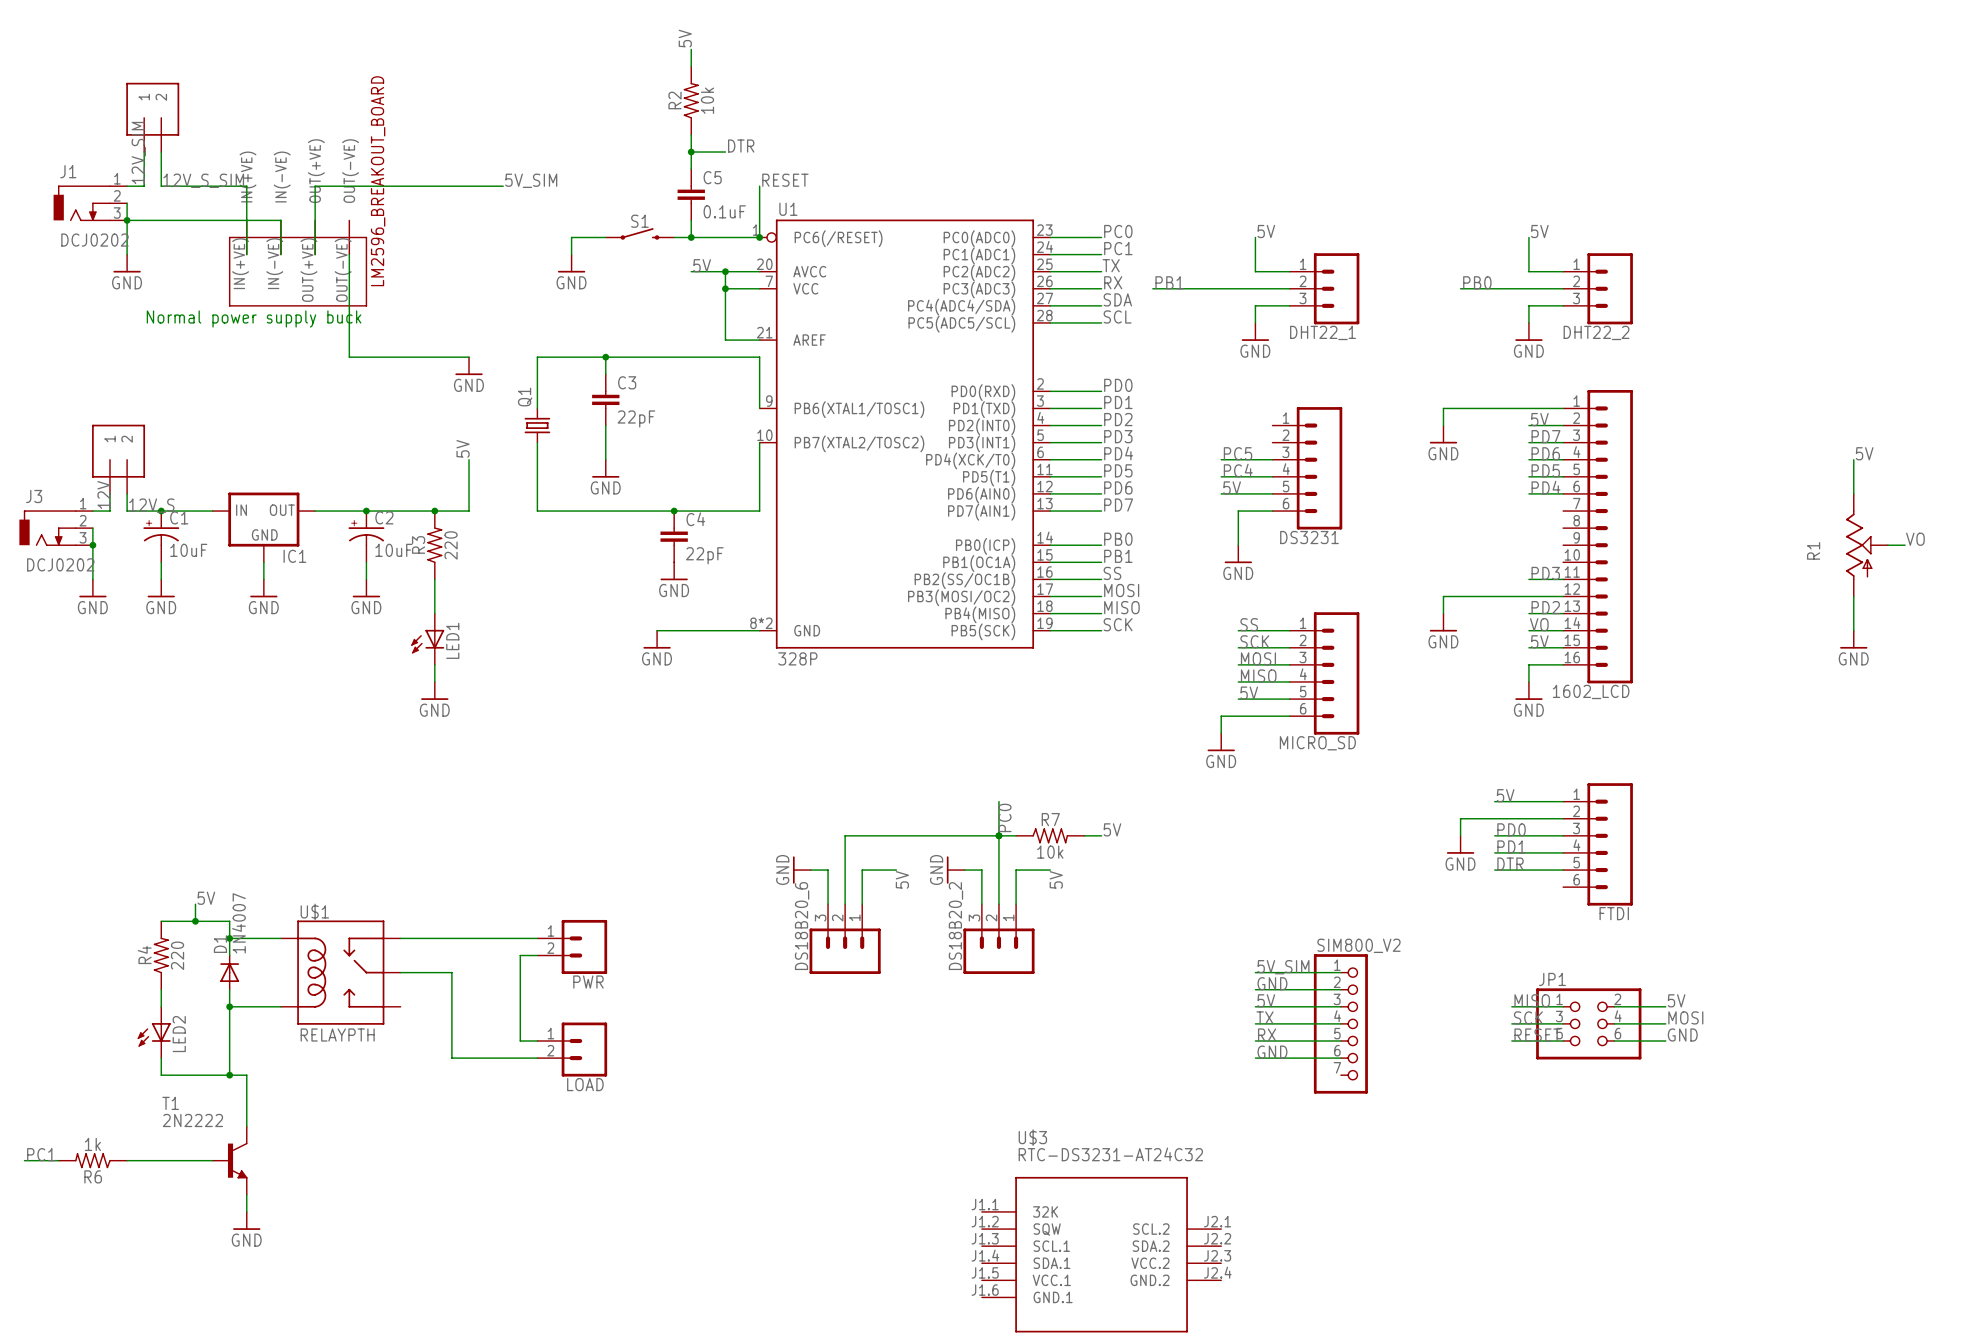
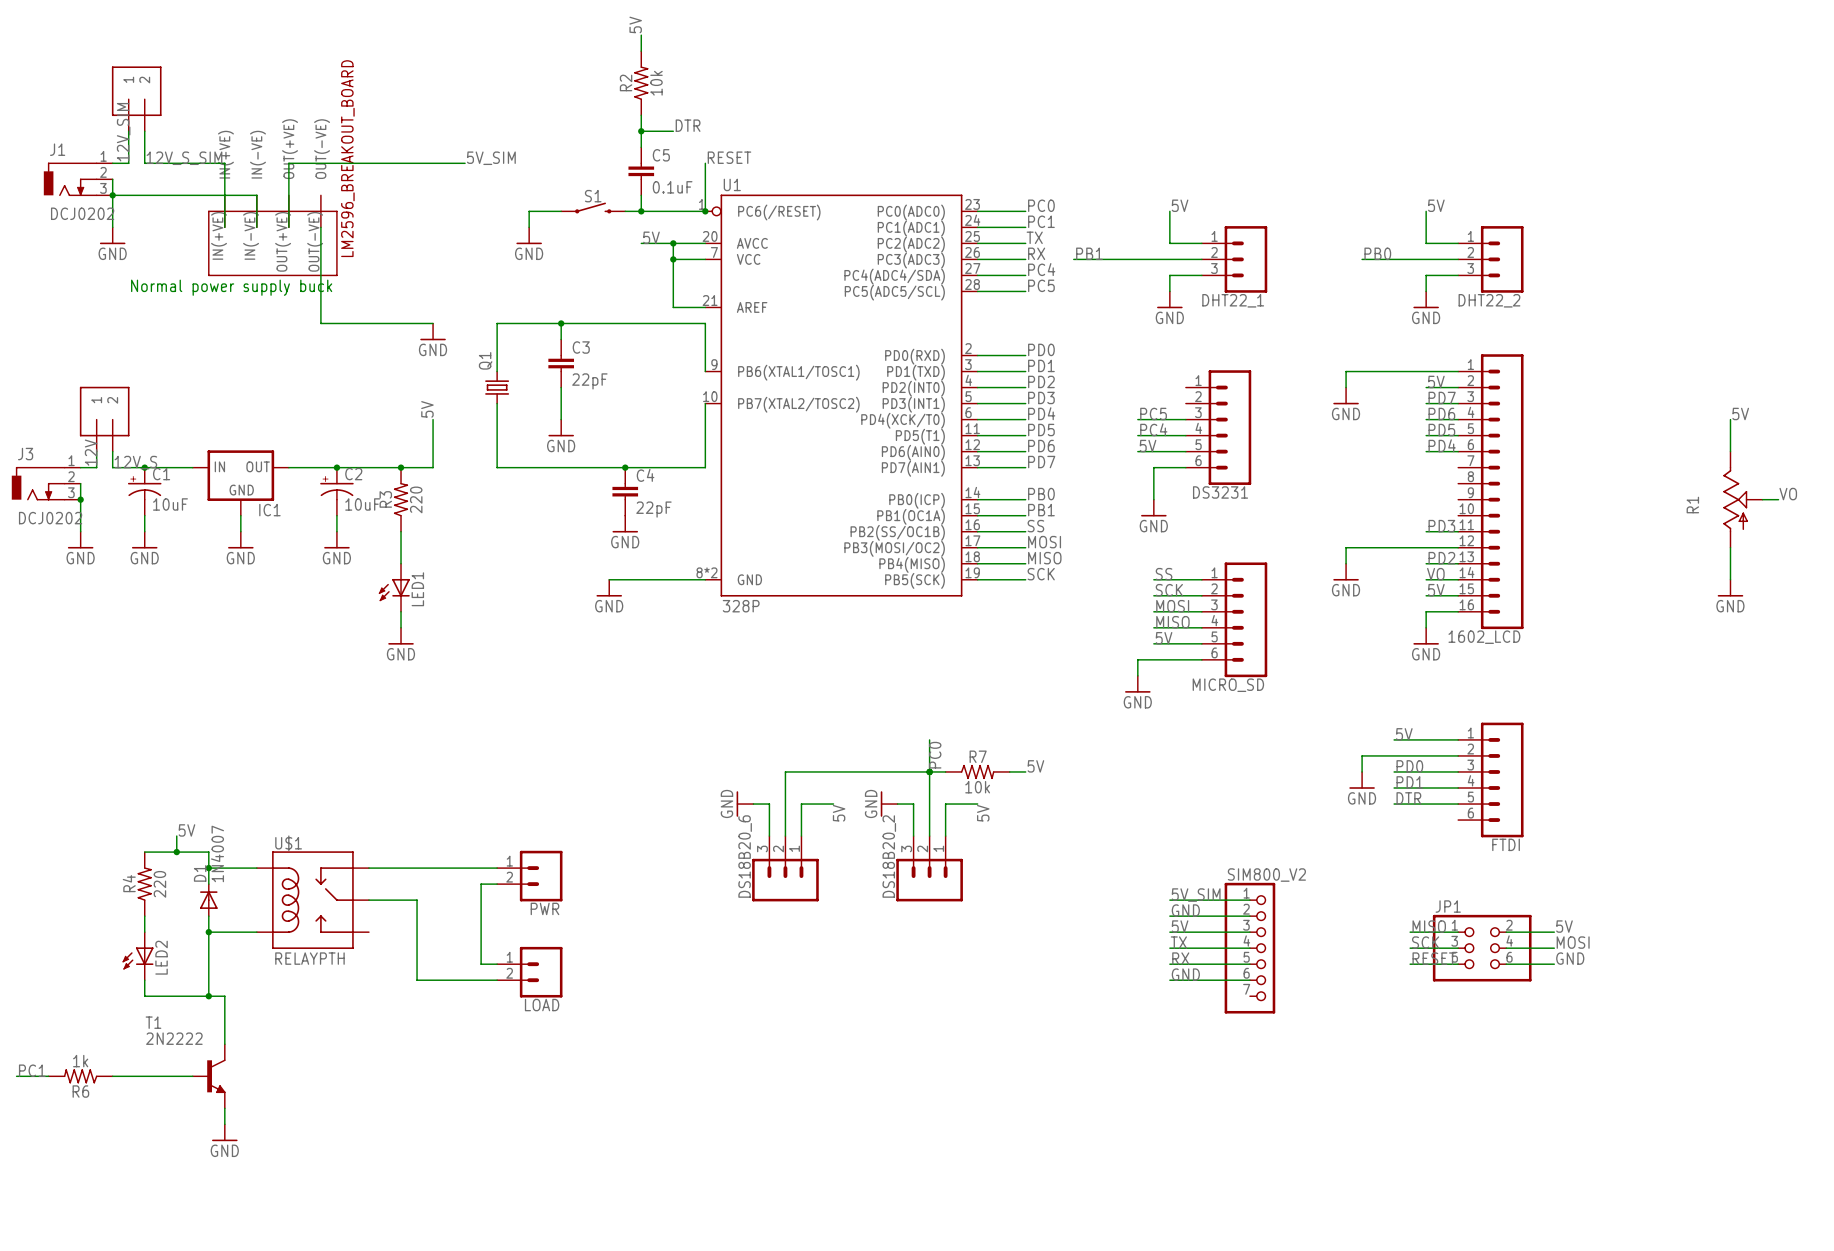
label: SDA (1117, 299) -> PC4 (1041, 269)
label: SCL (1117, 316) -> PC5 (1041, 285)
U$3: RTC-DS3231-AT24C32 (1101, 1254) -> none

